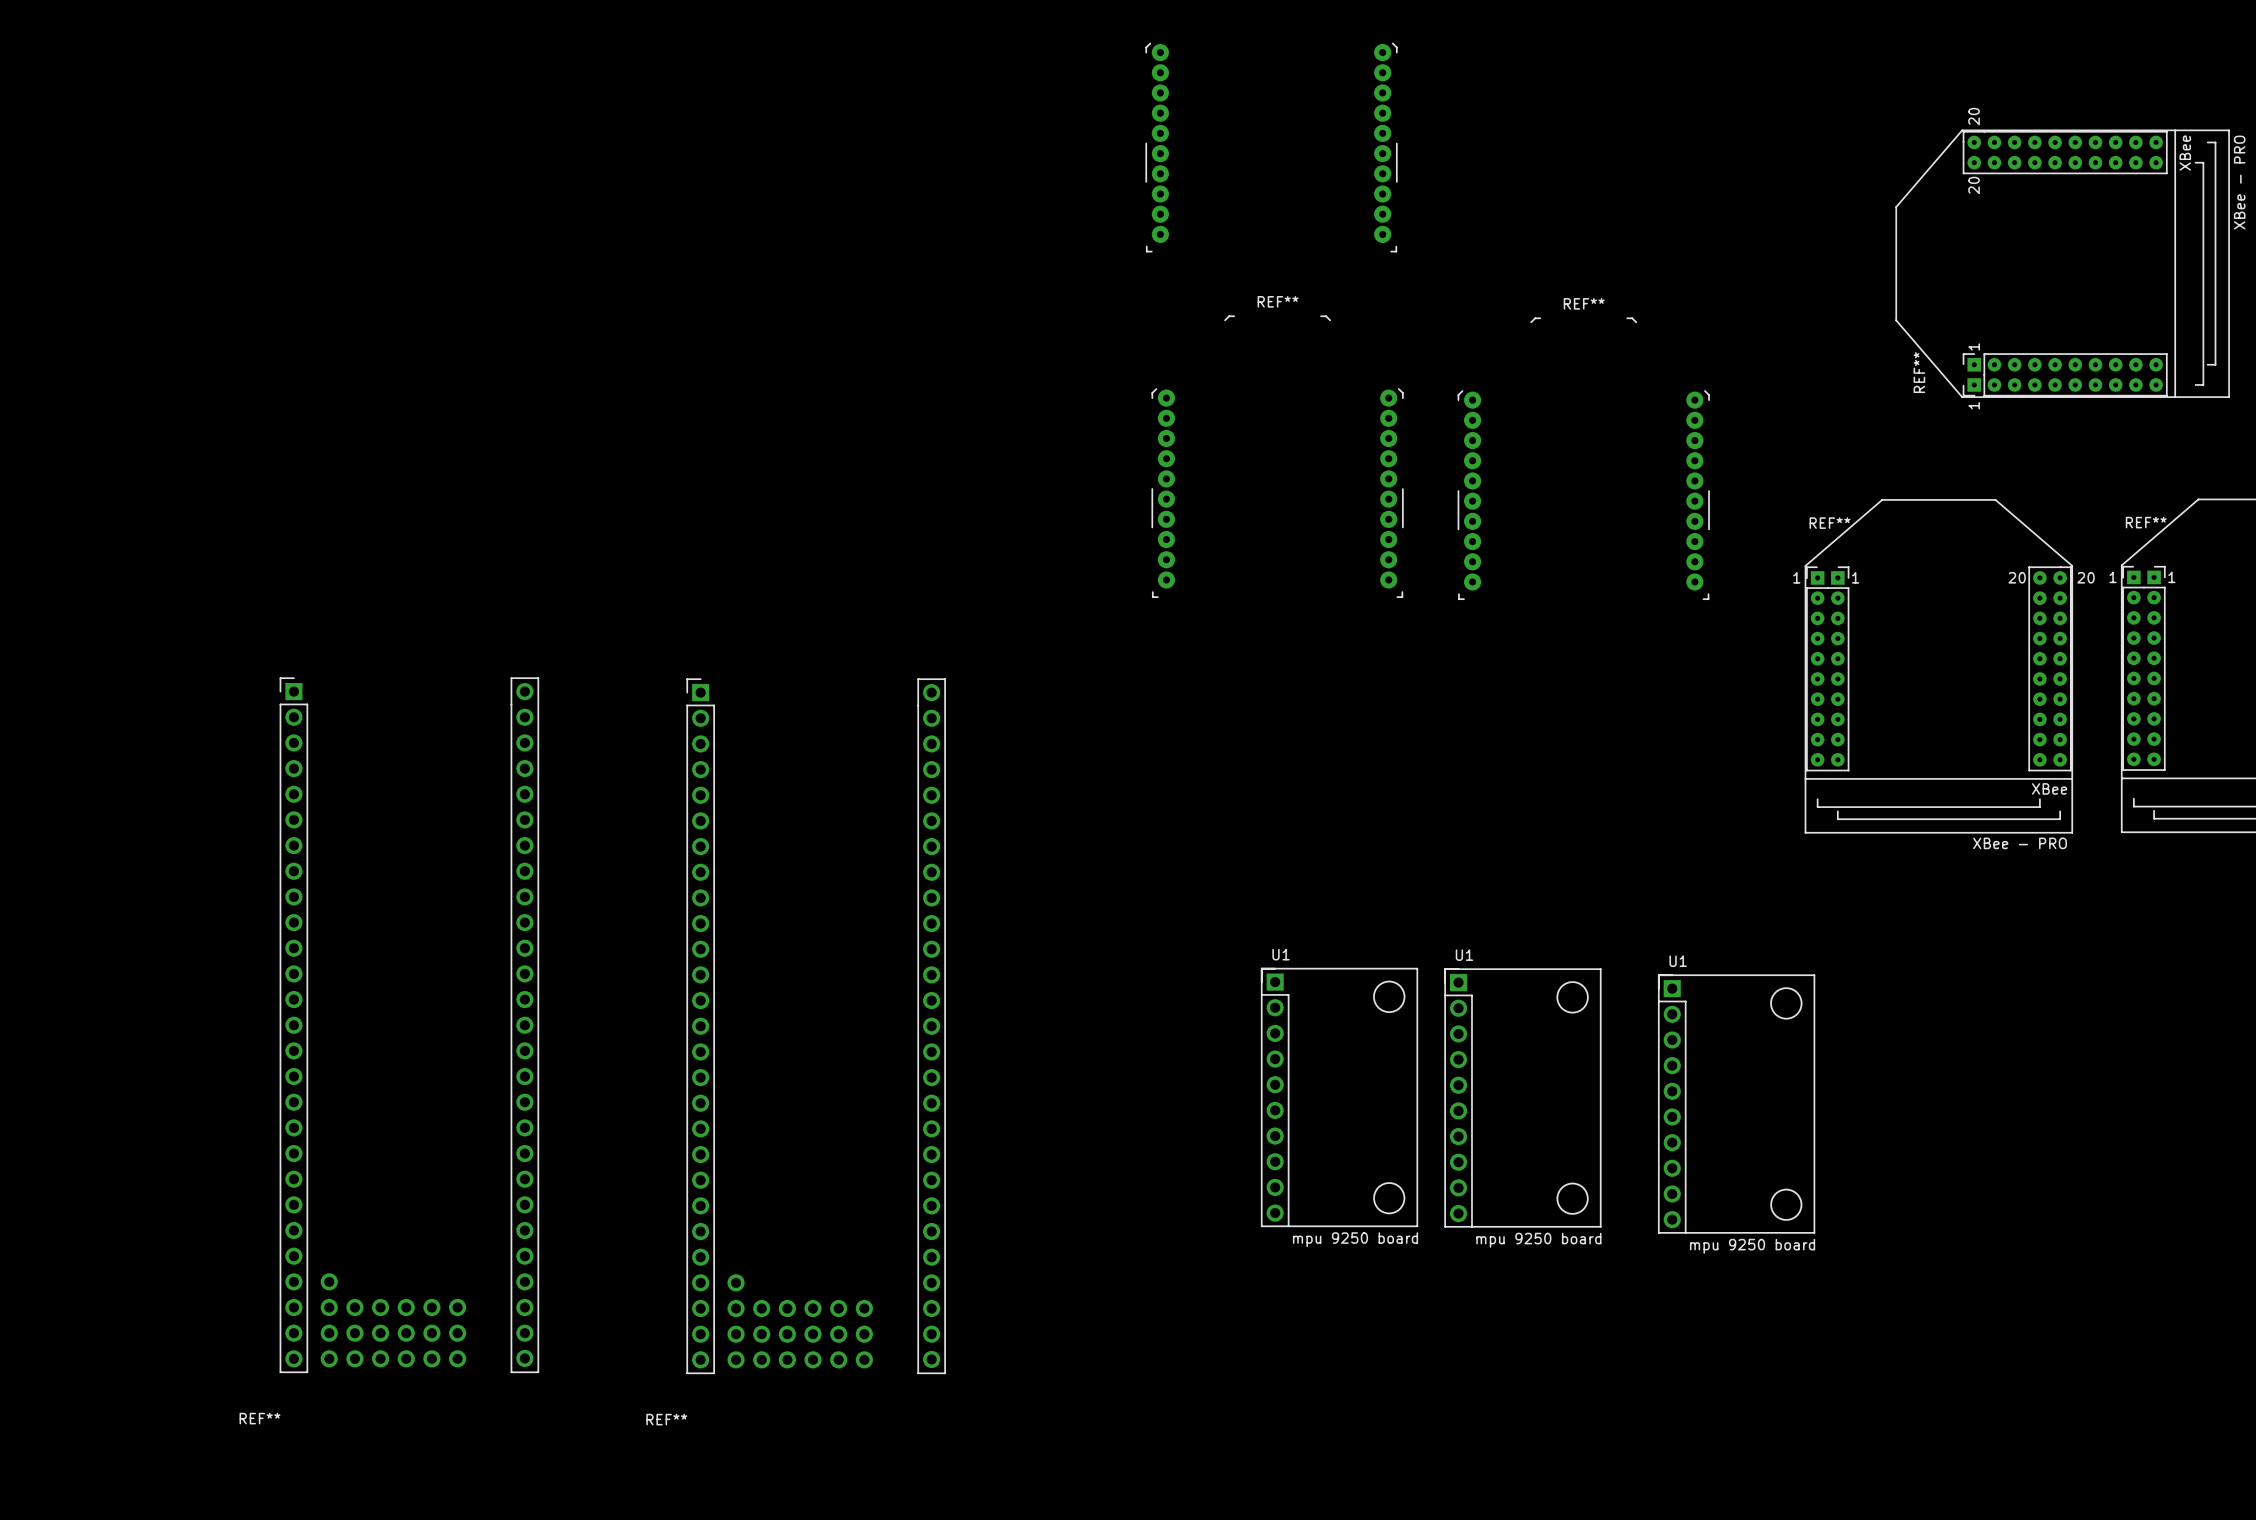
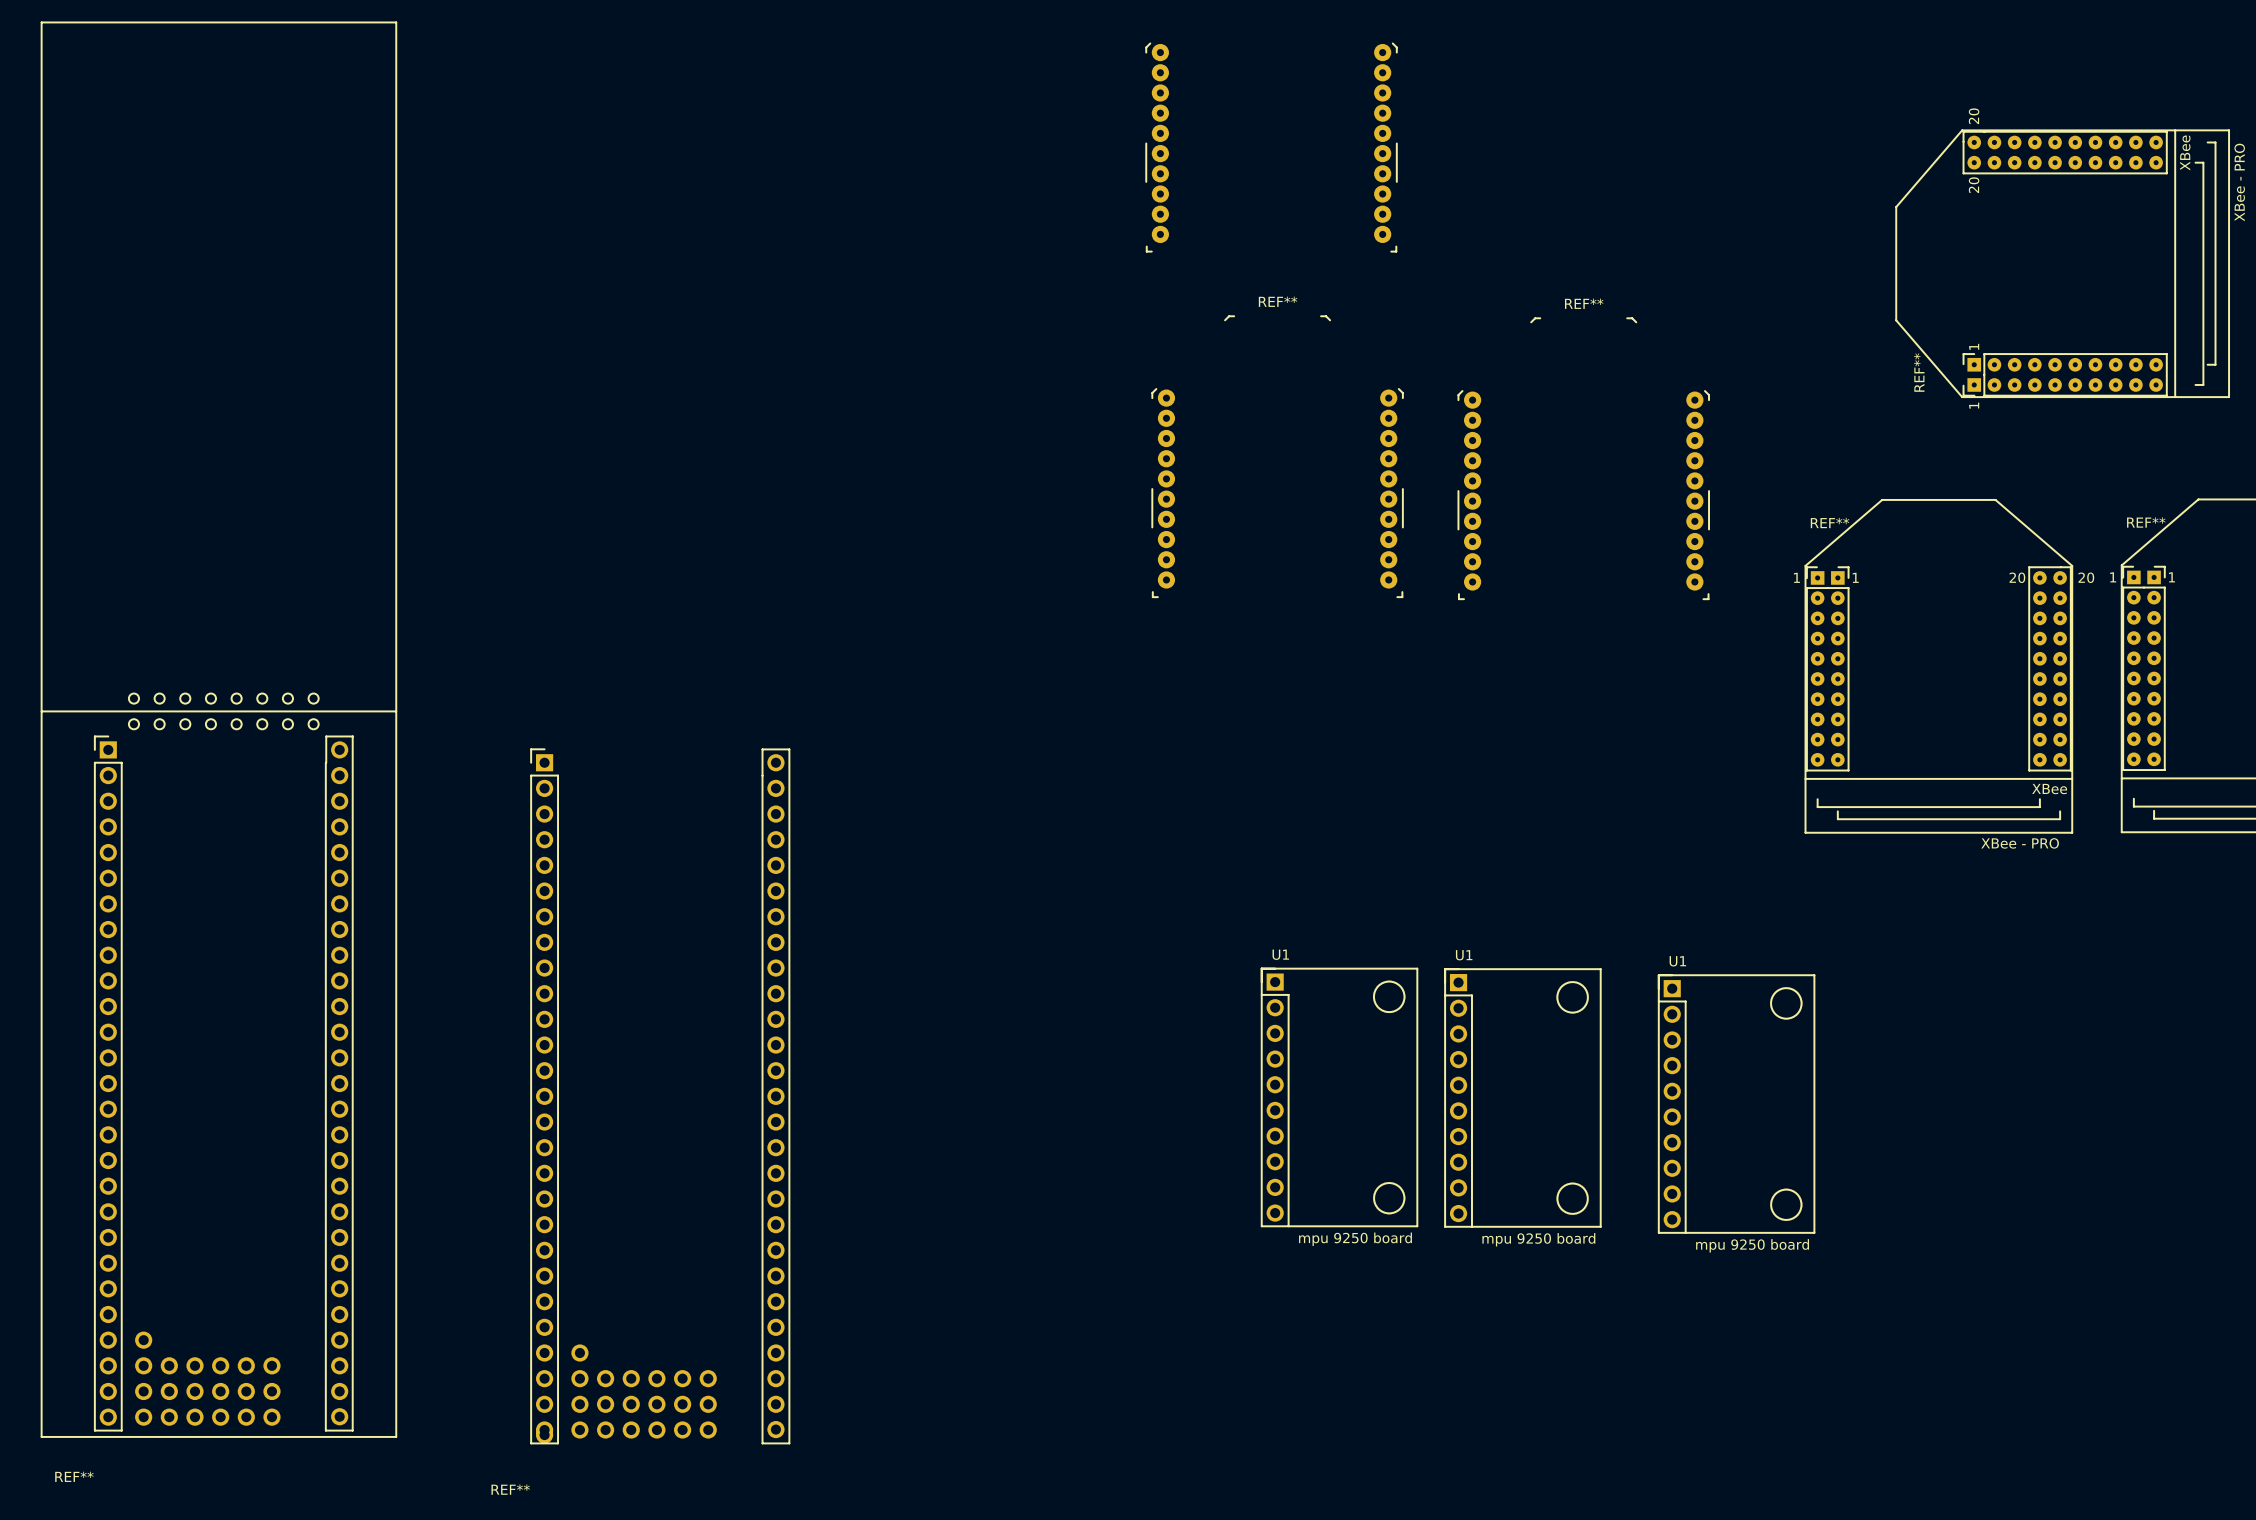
REF**: none -> (218, 729)
REF**: (409, 1025) -> none
REF**: (816, 1026) -> none
REF**: none -> (660, 1096)

